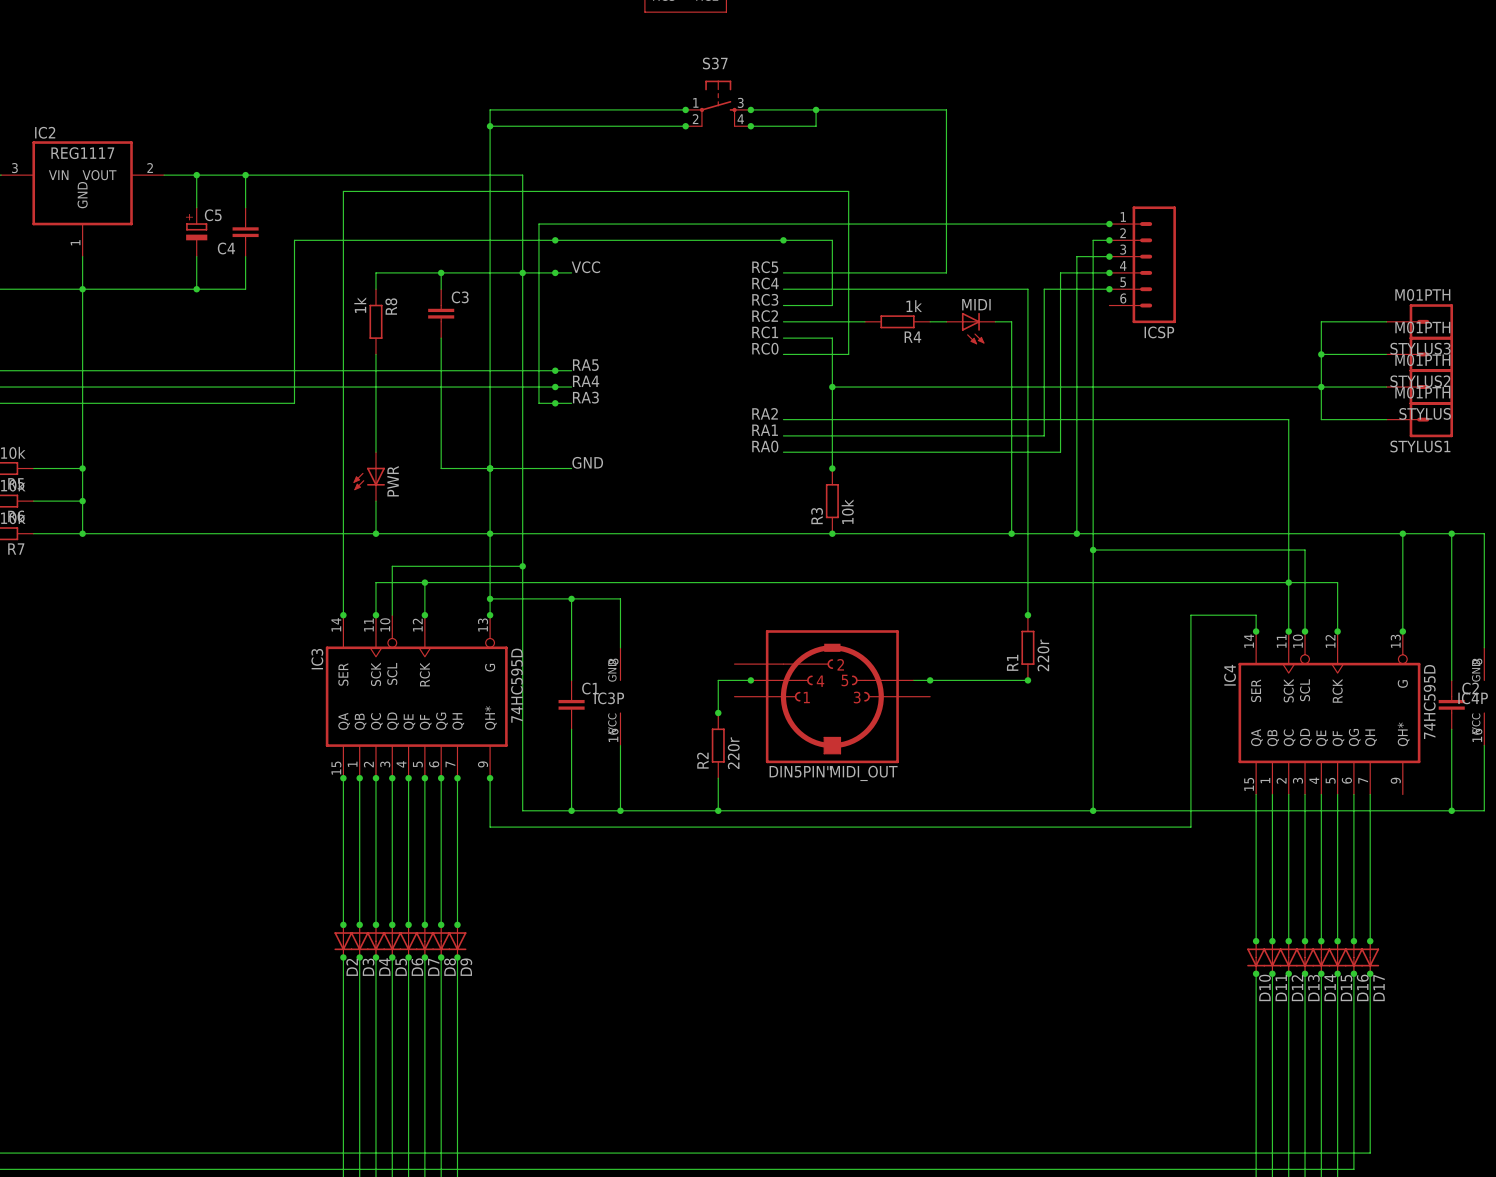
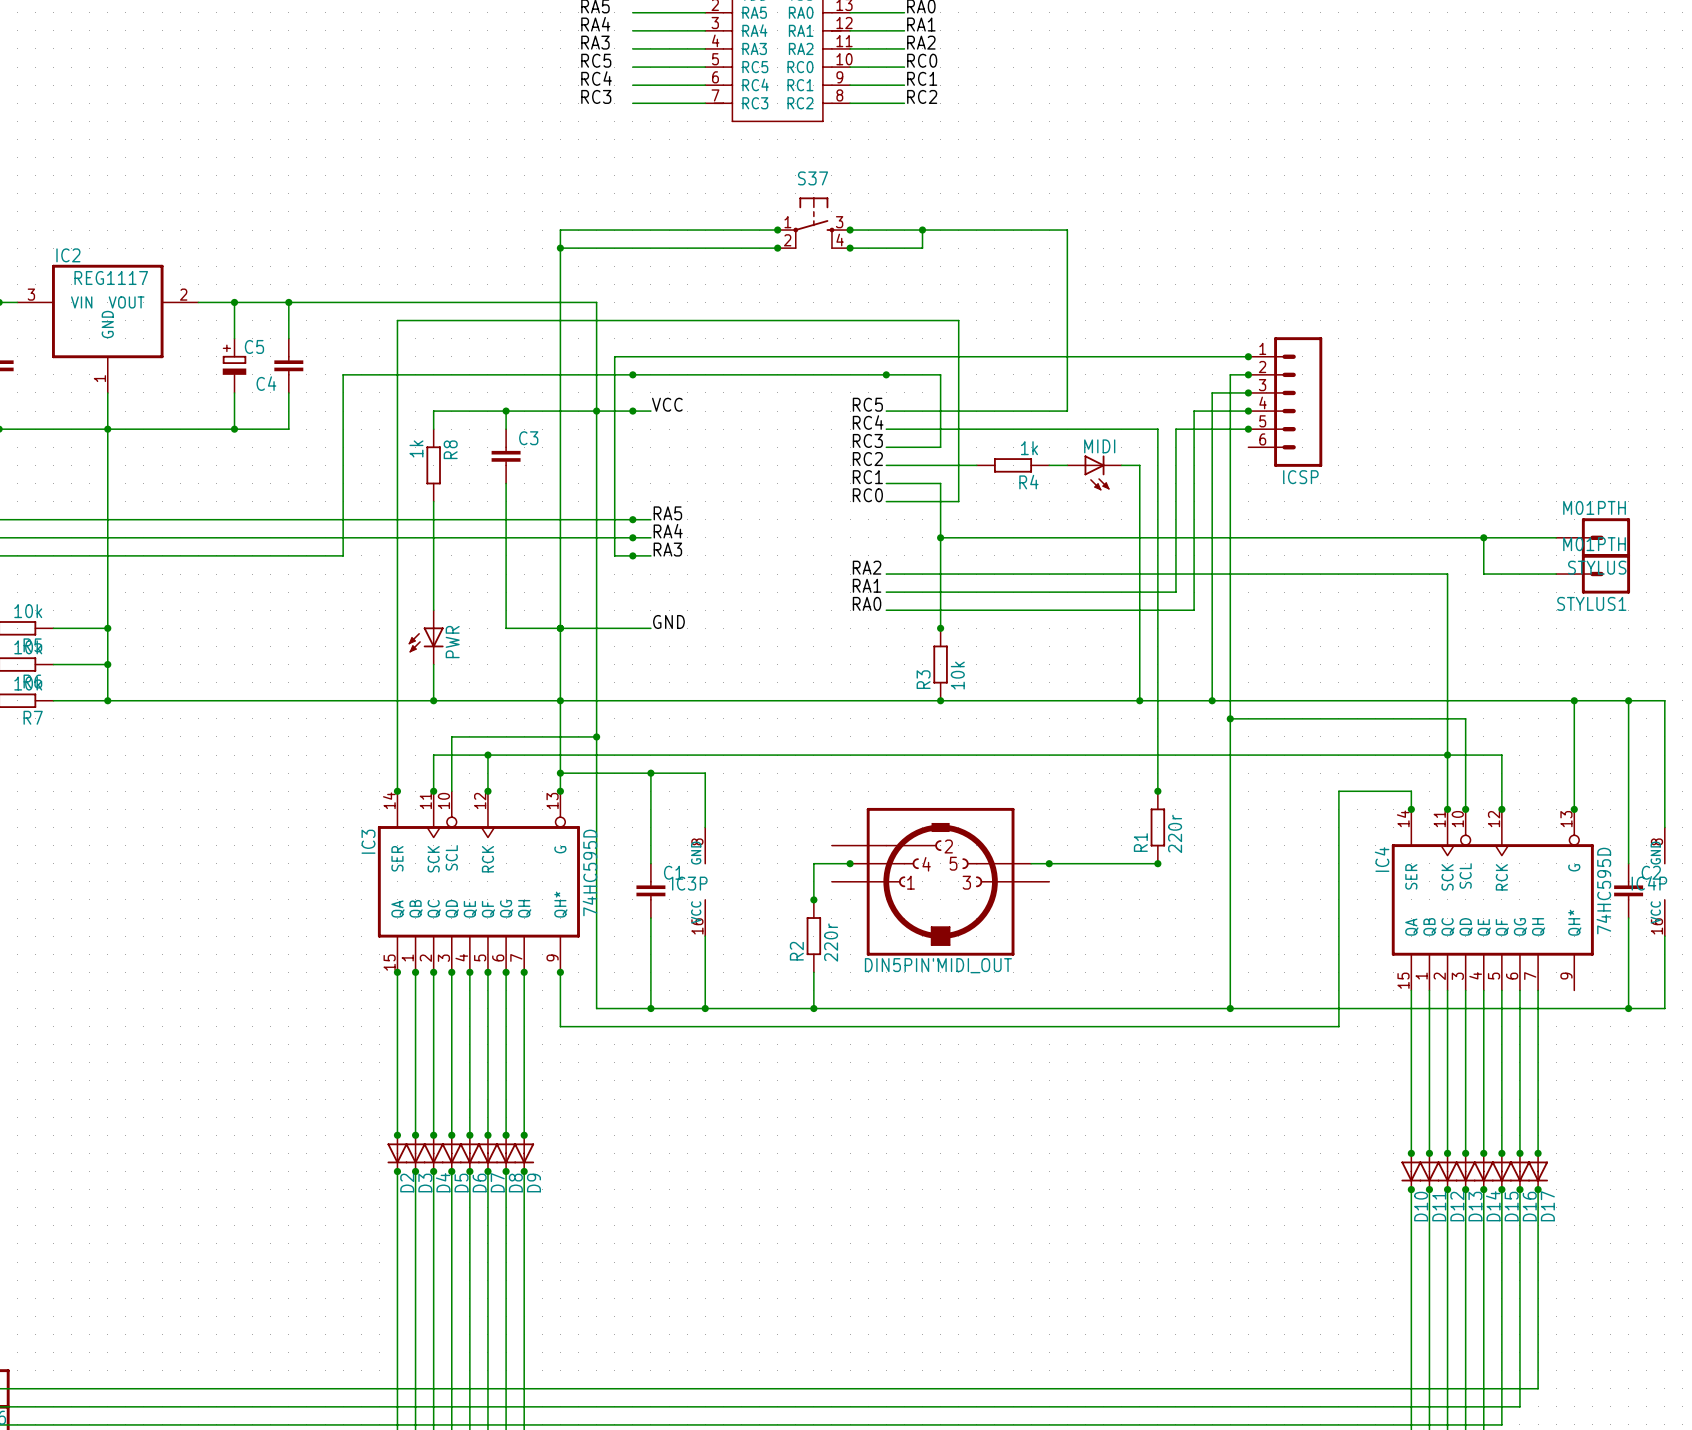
wire: (1386, 321) (1321, 321) (1321, 387) -> none
STYLUS3: M01PTH (1419, 321) -> none
wire: (1321, 354) (1386, 354) -> none
junction: (1321, 354) -> none
STYLUS2: M01PTH (1419, 354) -> none

